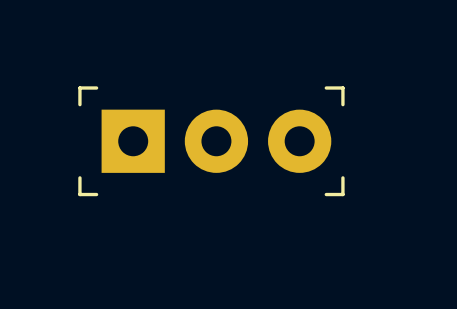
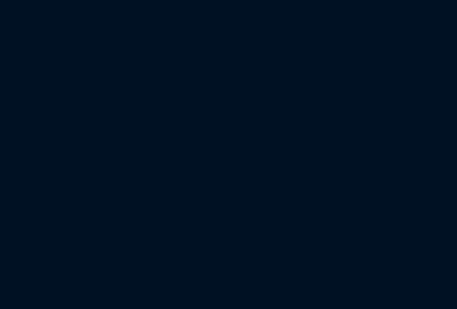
part: (211, 141) -> none

